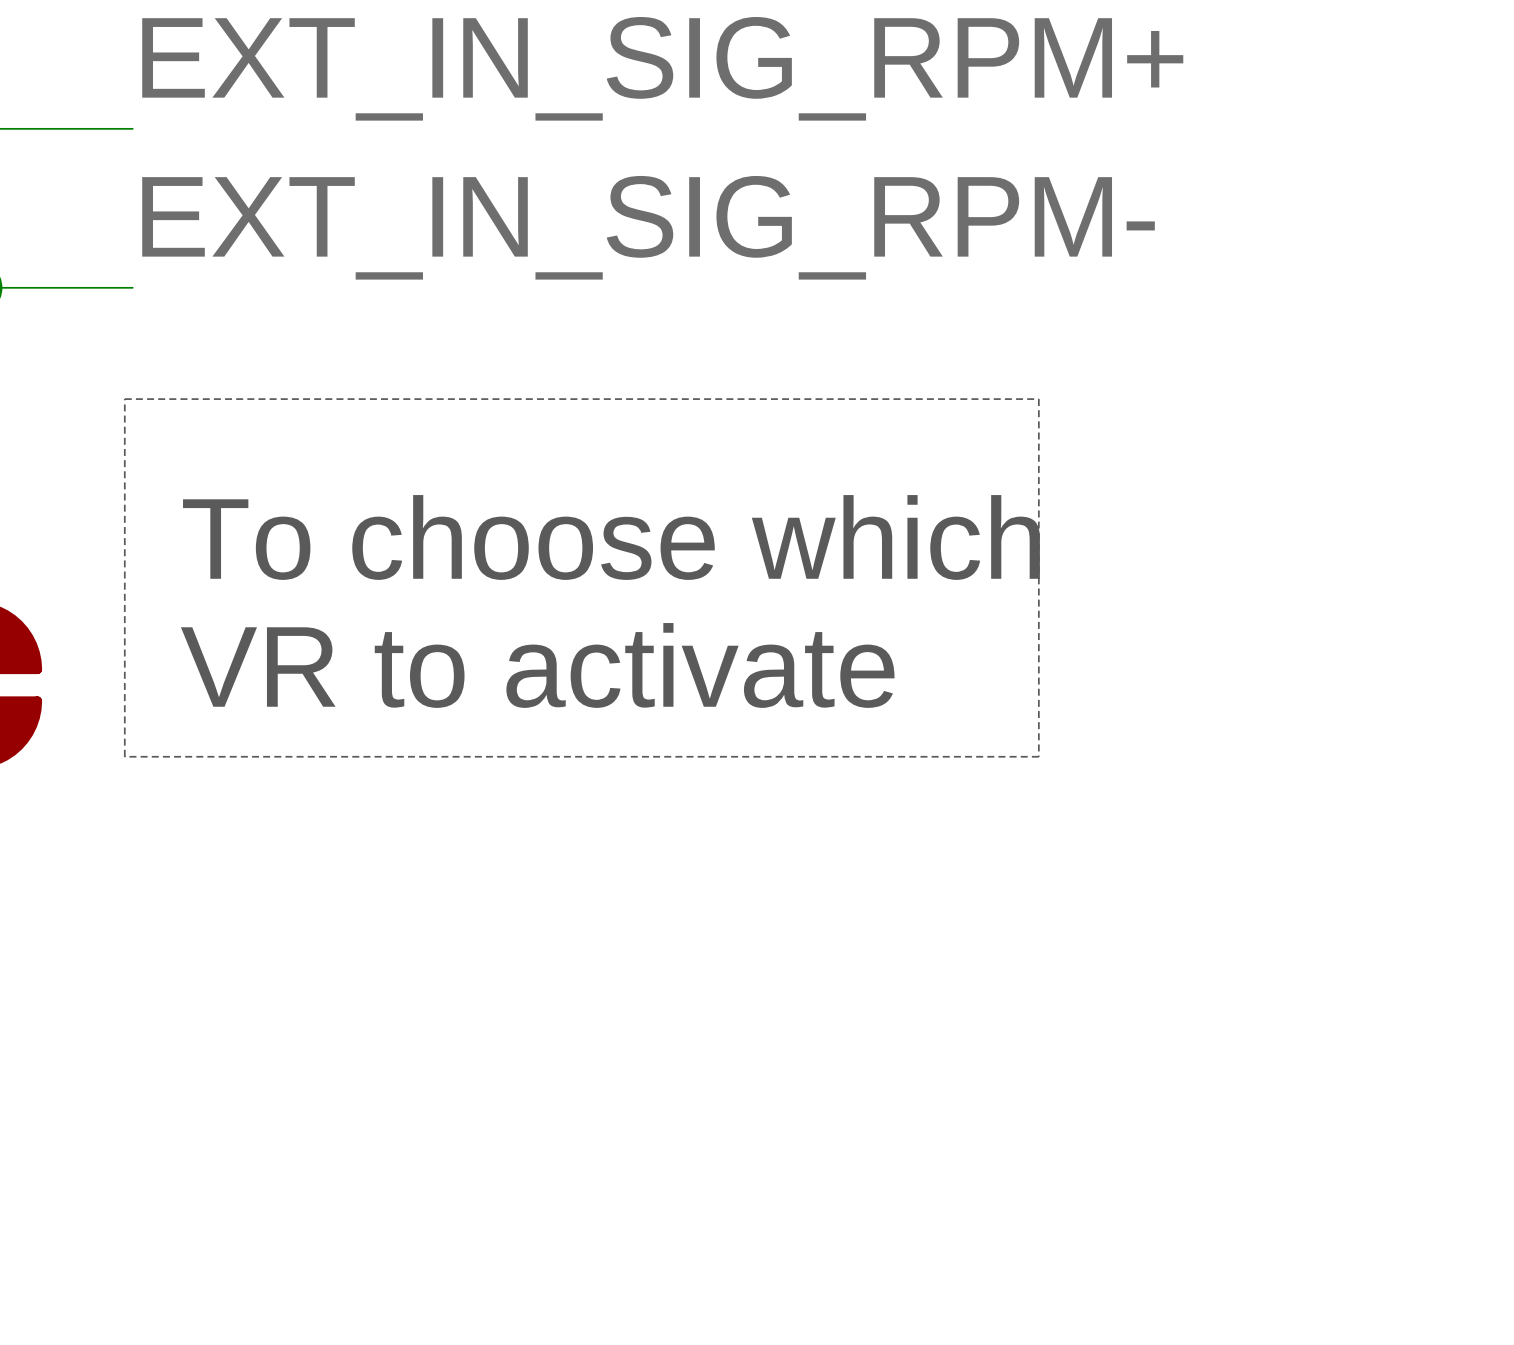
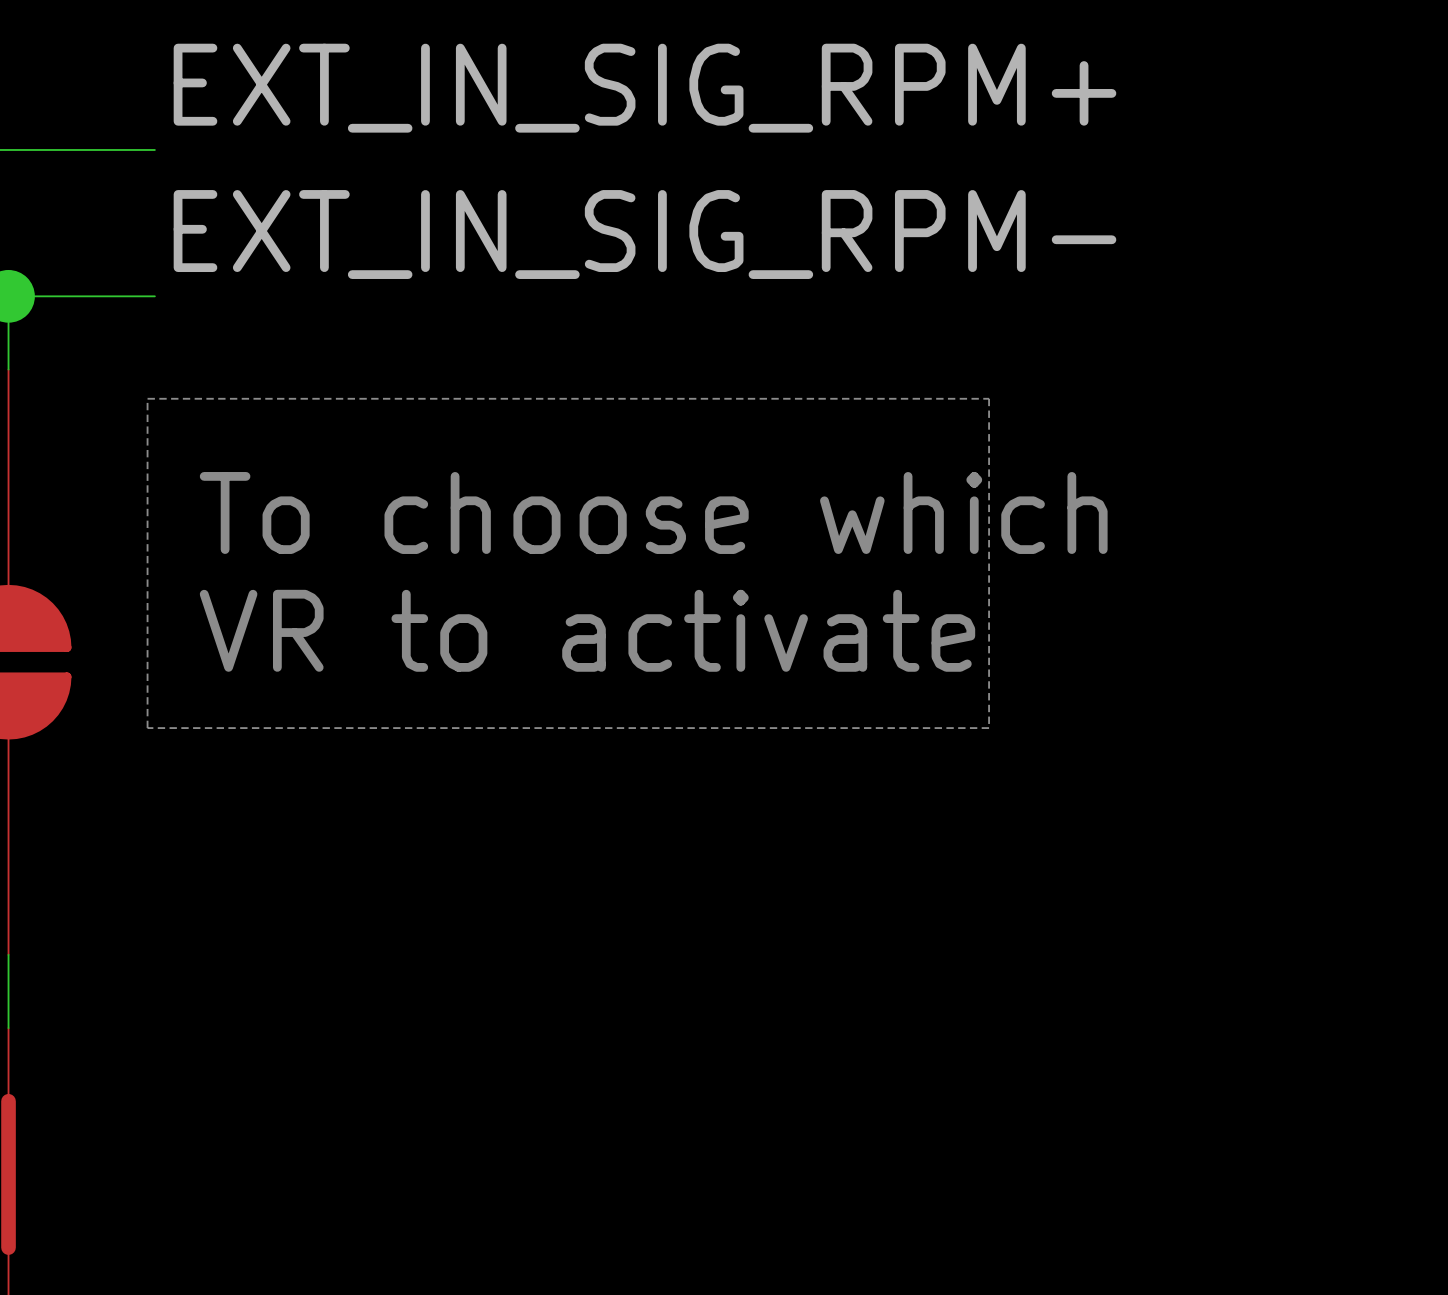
text position: To choose which (611, 537) -> To choose which (653, 512)
text position: VR to activate (537, 665) -> VR to activate (587, 630)

